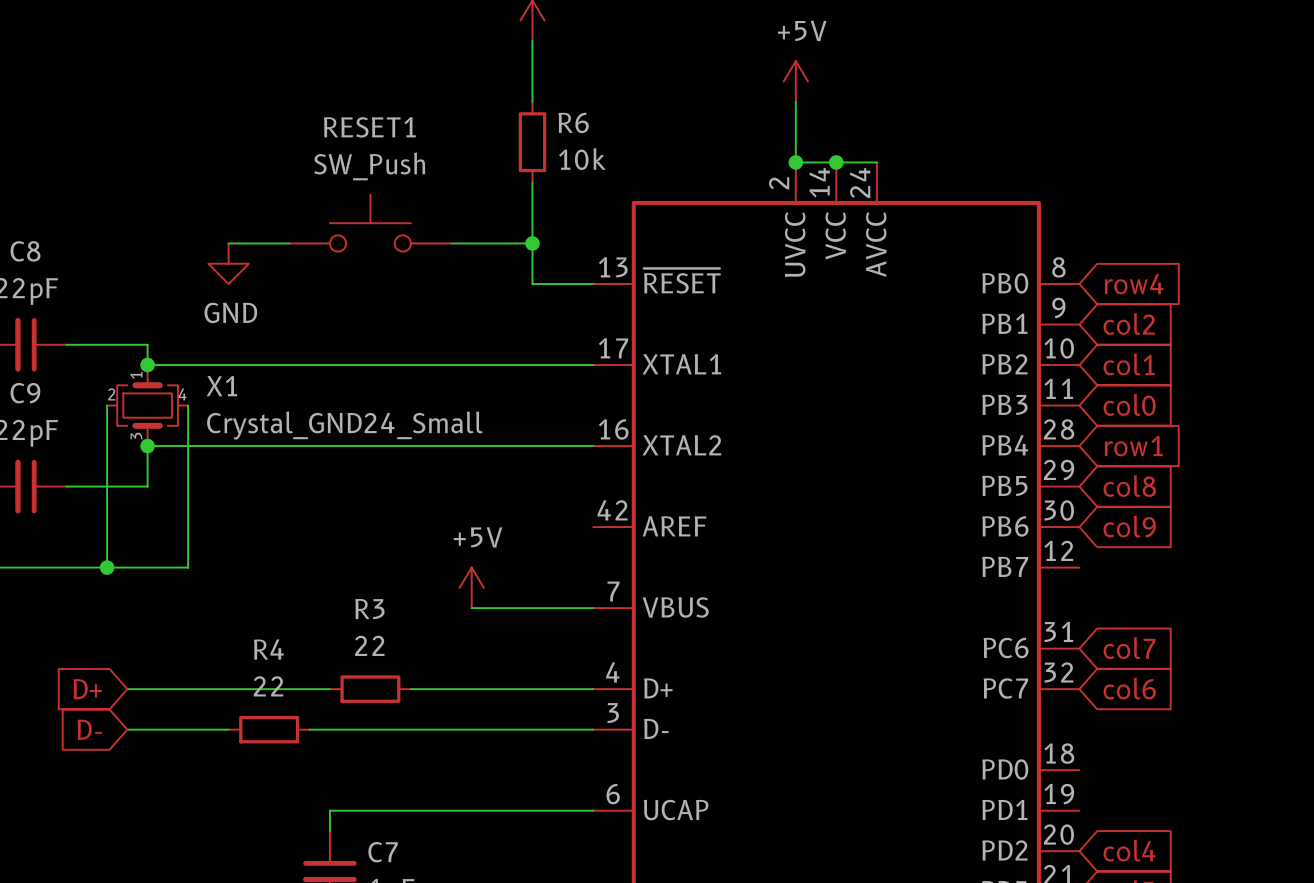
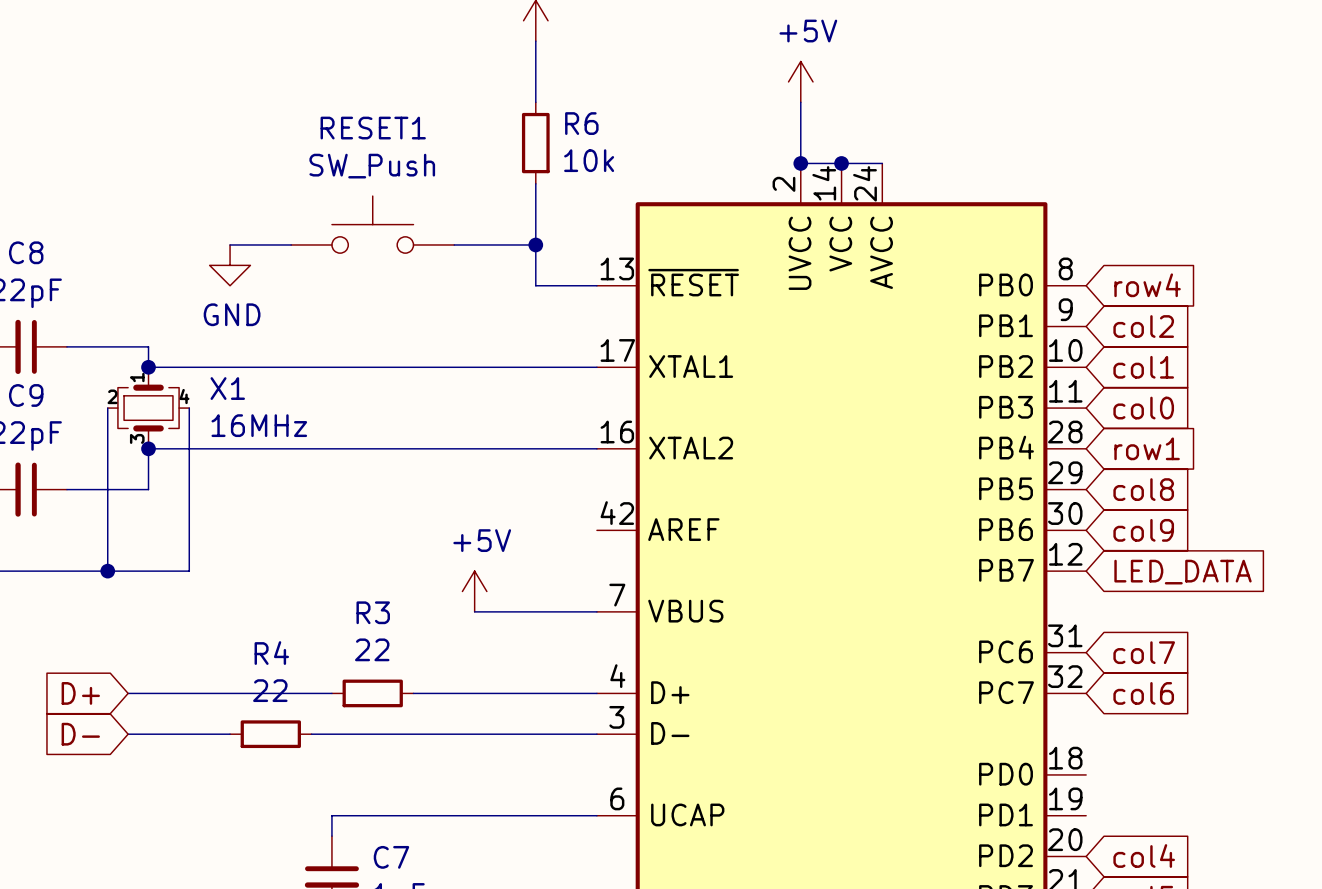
X1 value: Crystal_GND24_Small (344, 425) -> 16MHz (259, 425)
global label: none -> LED_DATA (1183, 572)

